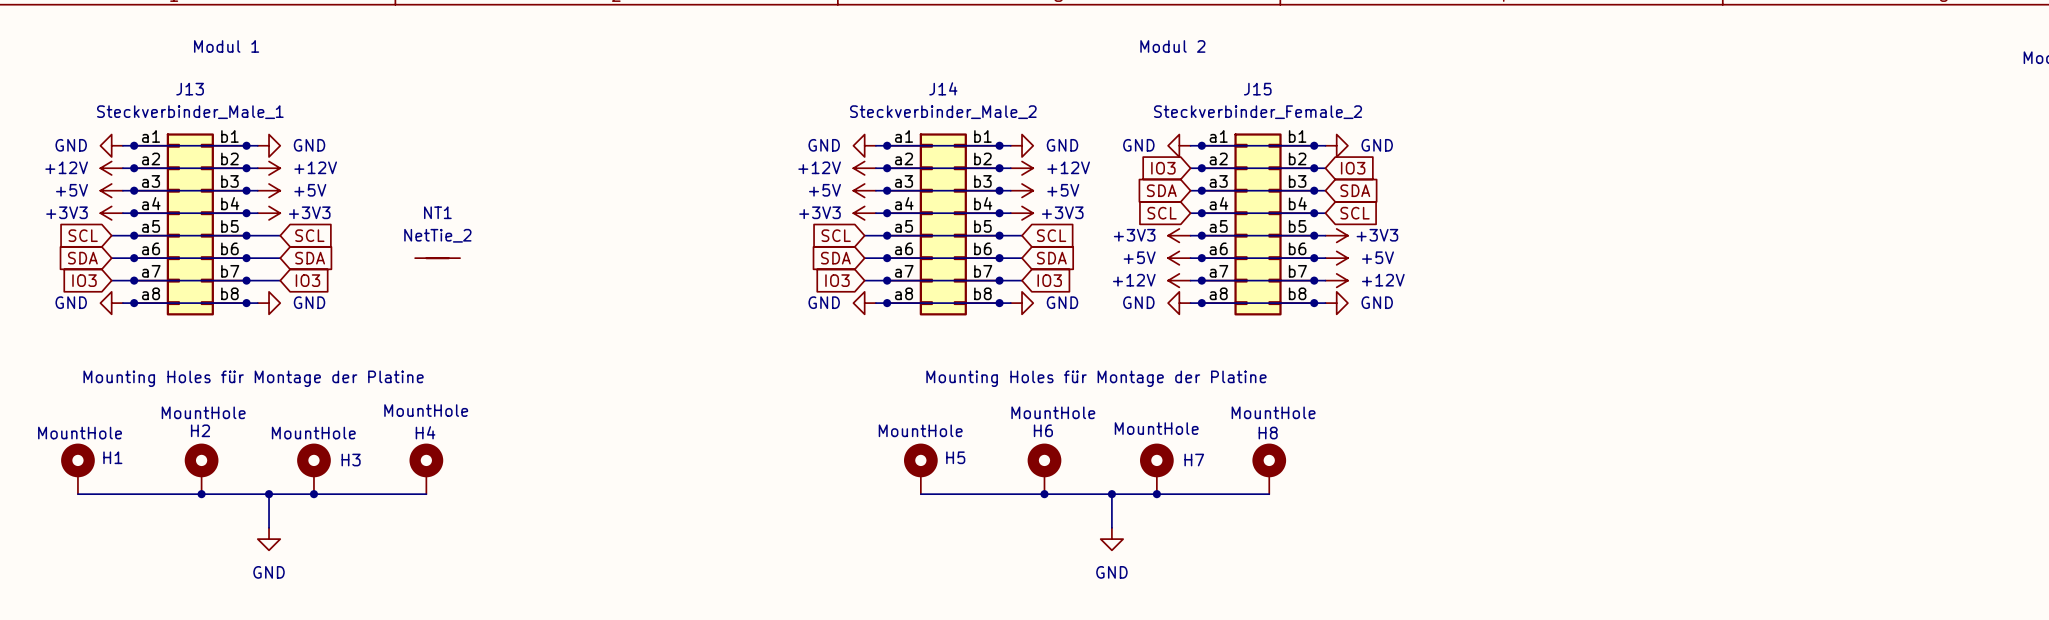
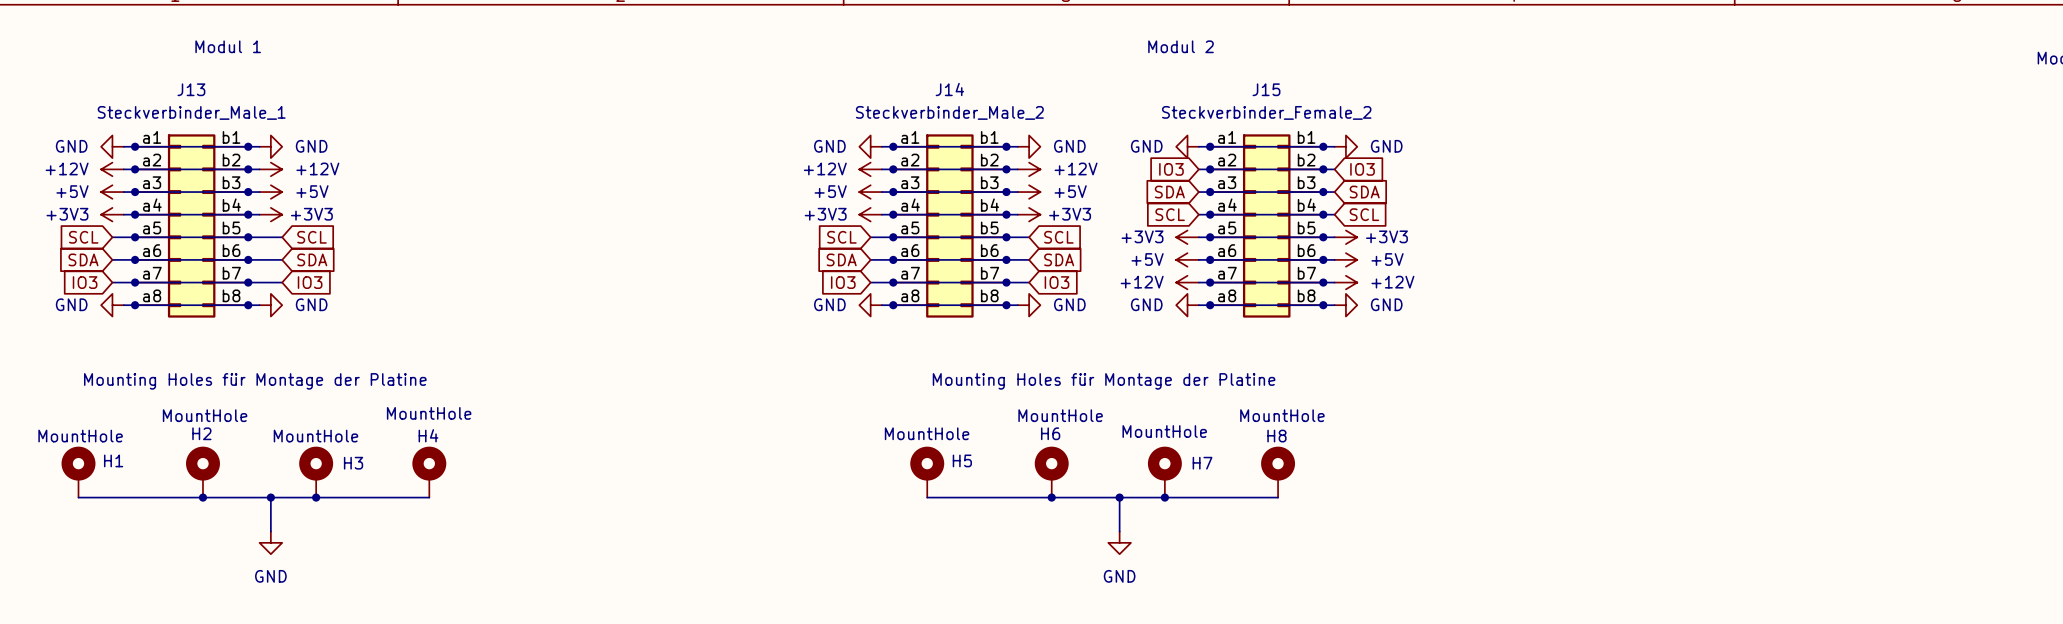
NT1: NetTie_2 (437, 258) -> none

